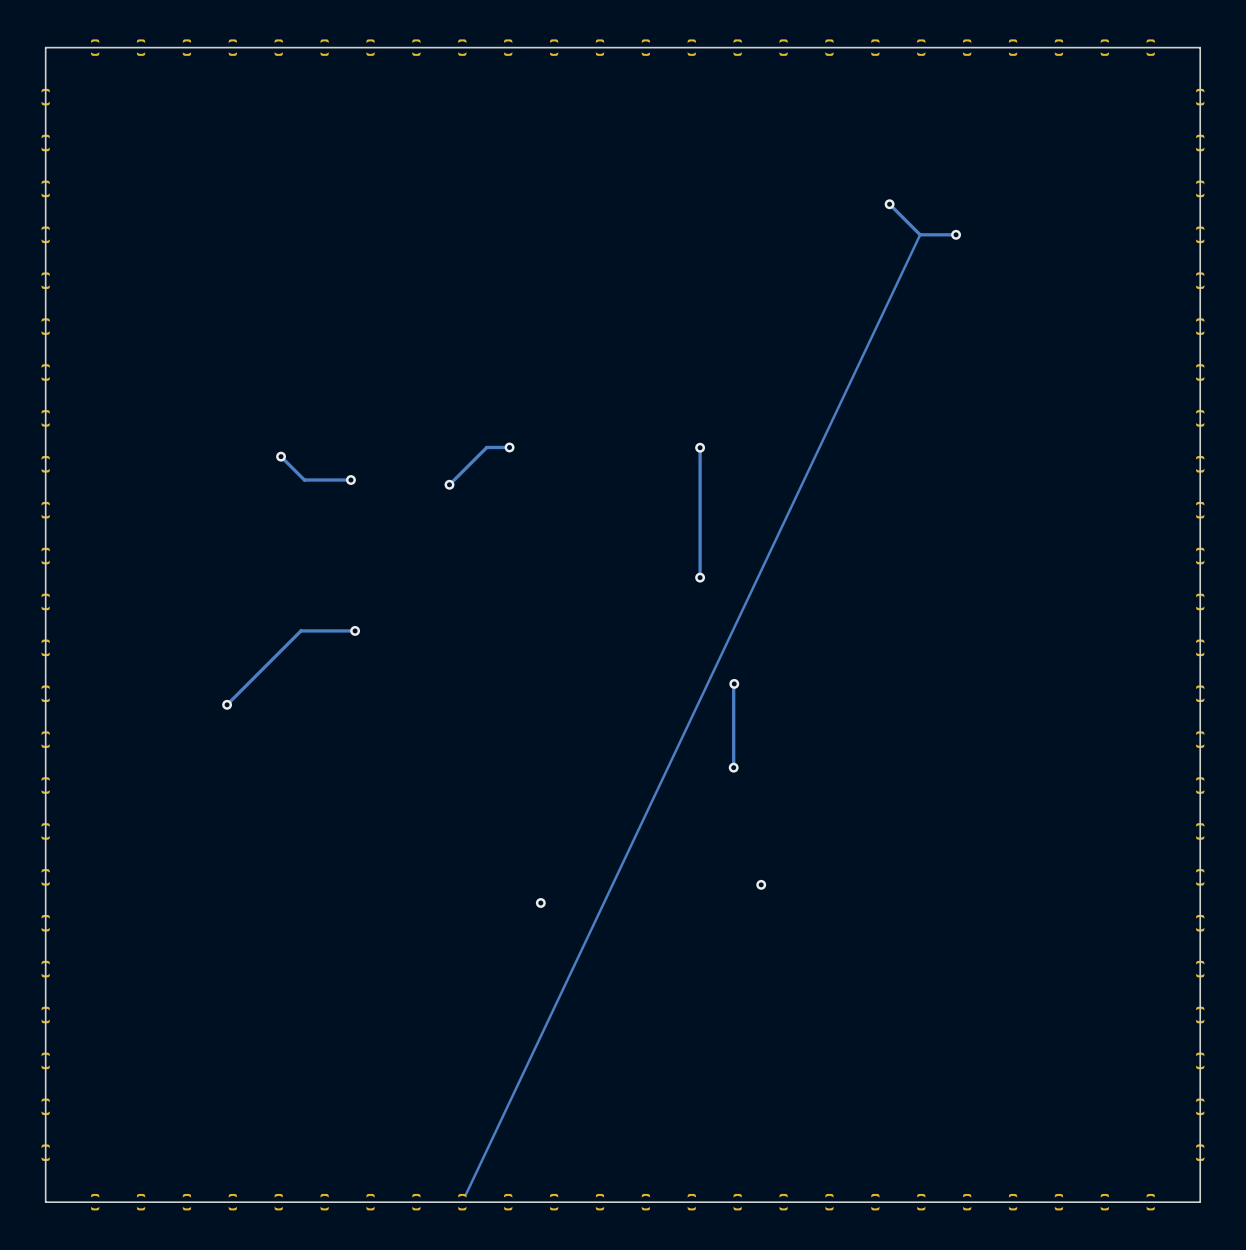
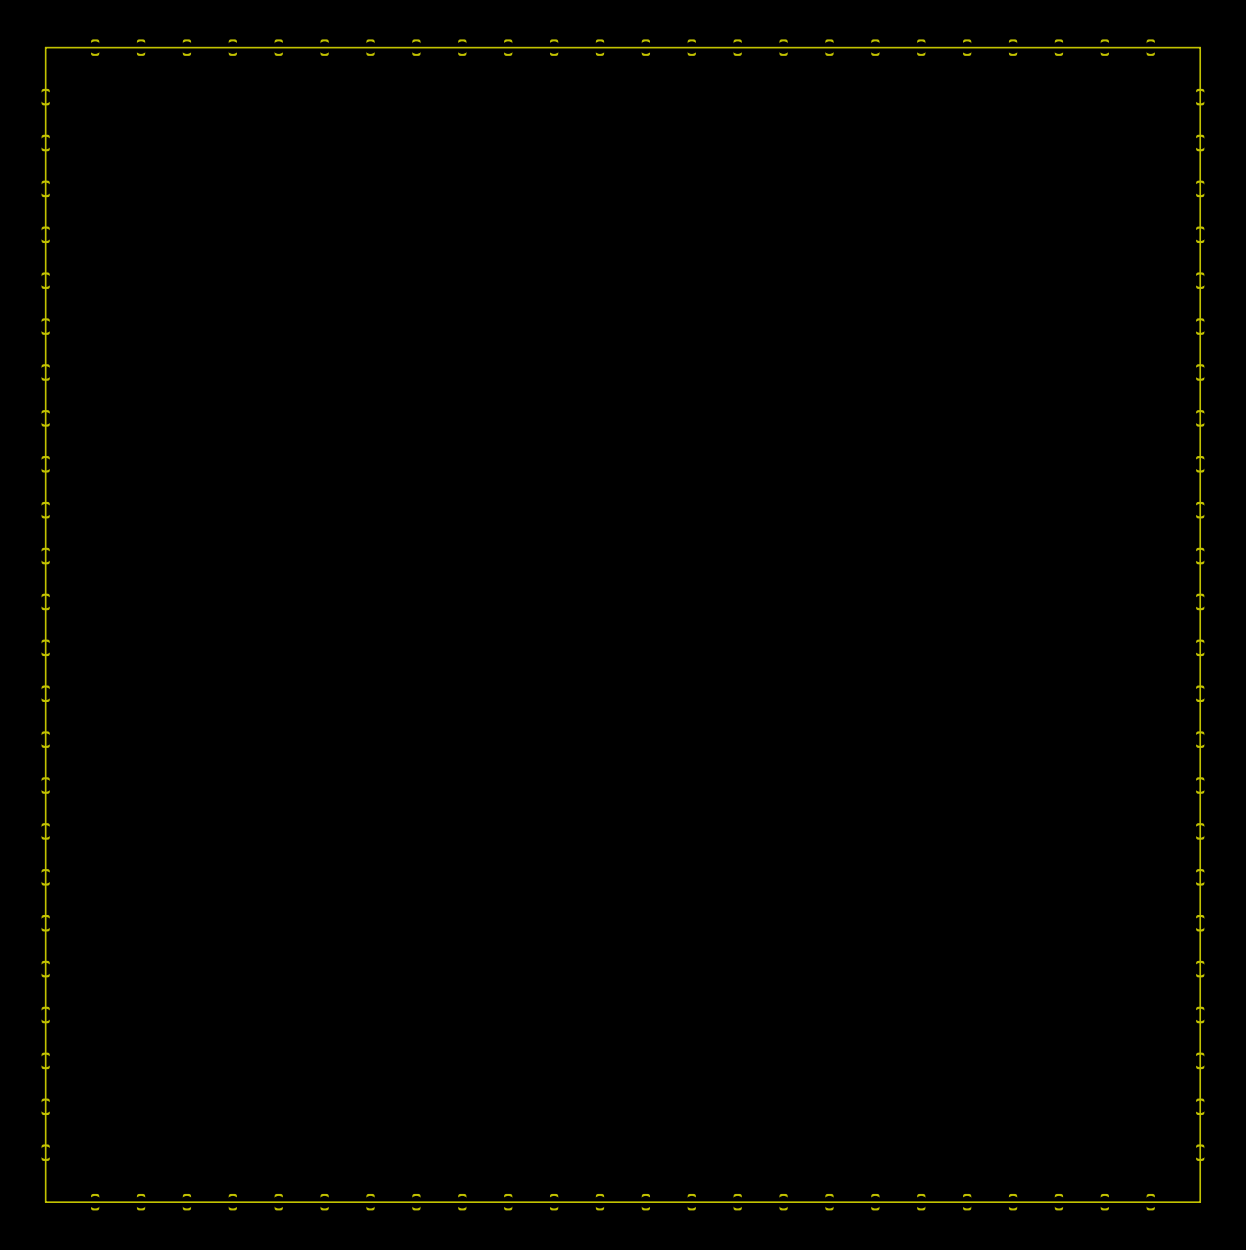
track: (889, 204) (920, 234) -> none
via: (889, 204) -> none
track: (920, 234) (462, 1202) -> none
track: (956, 234) (920, 234) -> none
via: (956, 234) -> none
track: (509, 447) (486, 447) (449, 484) -> none
via: (509, 447) -> none
track: (700, 447) (700, 577) -> none
via: (700, 447) -> none
track: (281, 456) (304, 480) (350, 480) -> none
via: (281, 456) -> none
via: (350, 480) -> none
via: (449, 484) -> none
via: (700, 577) -> none
track: (355, 630) (300, 630) (227, 704) -> none
via: (355, 630) -> none
track: (734, 683) (733, 767) -> none
via: (734, 683) -> none
via: (227, 704) -> none
via: (733, 767) -> none
via: (761, 884) -> none
via: (540, 903) -> none

